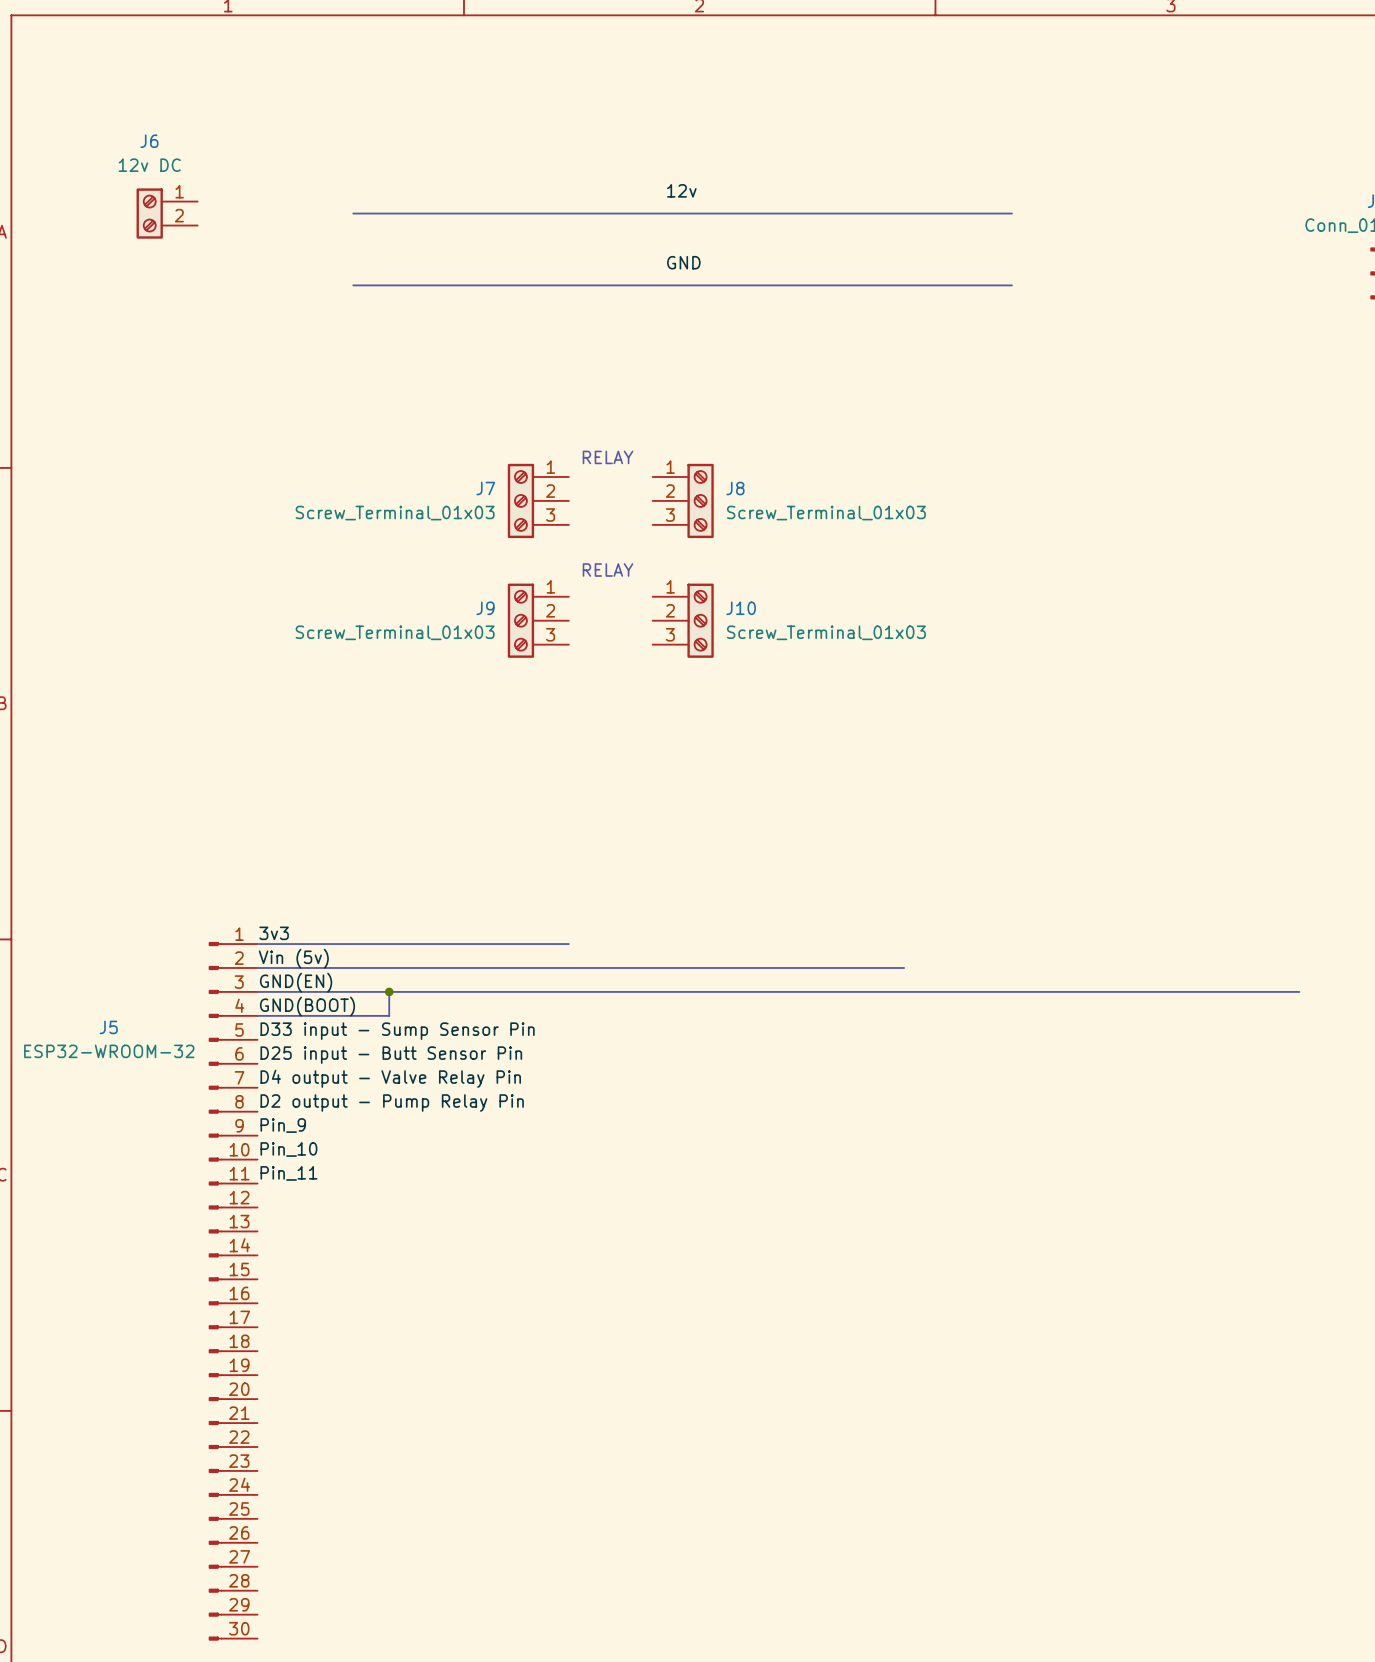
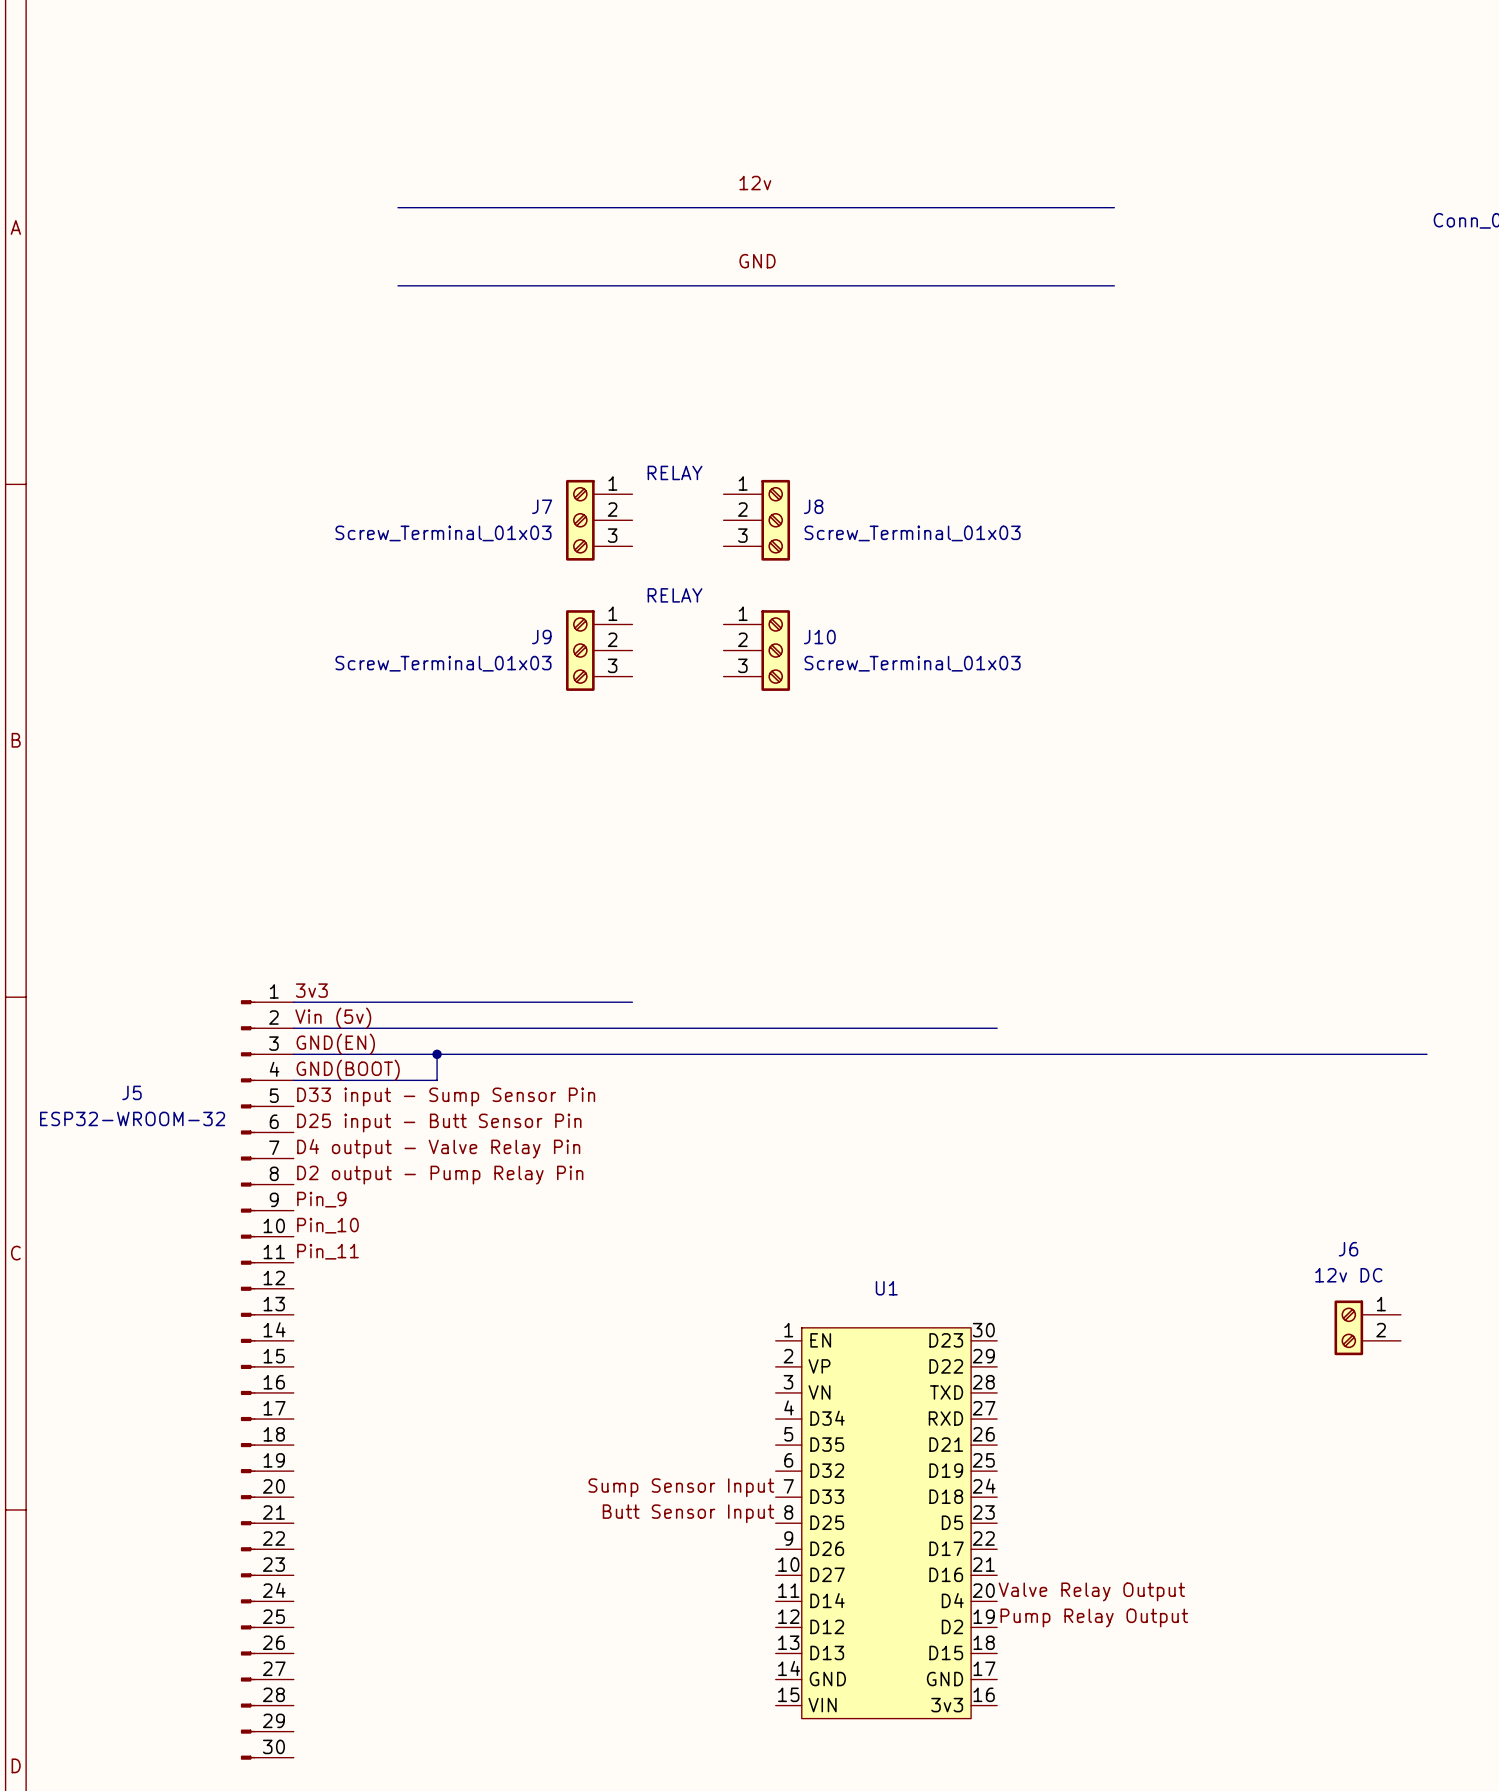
J6 position: (167, 213) -> (1367, 1327)
label: none -> Sump Sensor Input (681, 1487)
label: none -> Butt Sensor Input (688, 1513)
U1: none -> (886, 1523)
label: none -> Valve Relay Output (1091, 1591)
label: none -> Pump Relay Output (1094, 1617)

